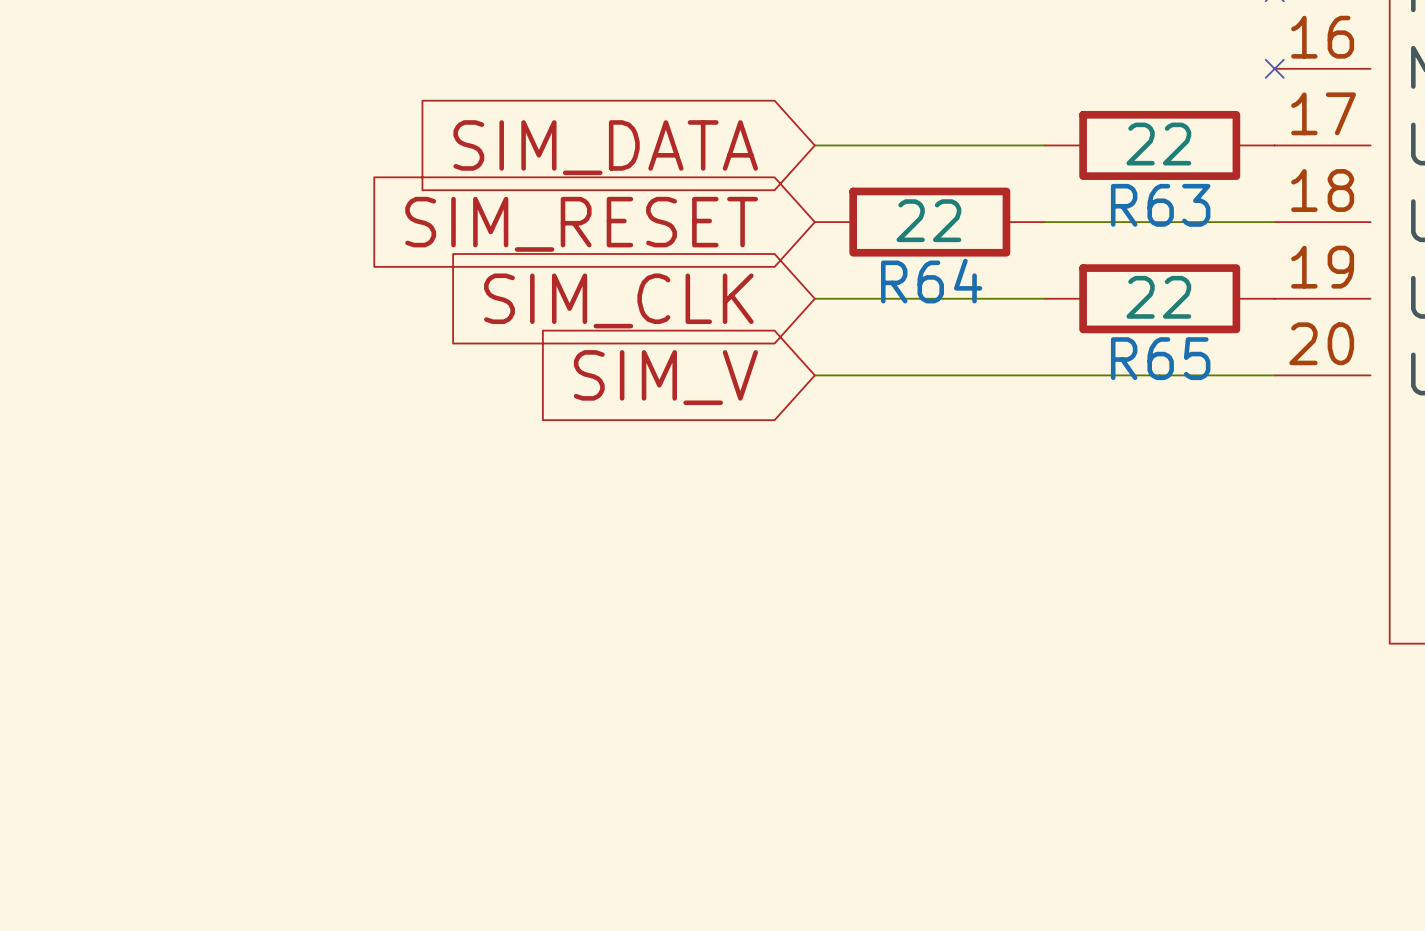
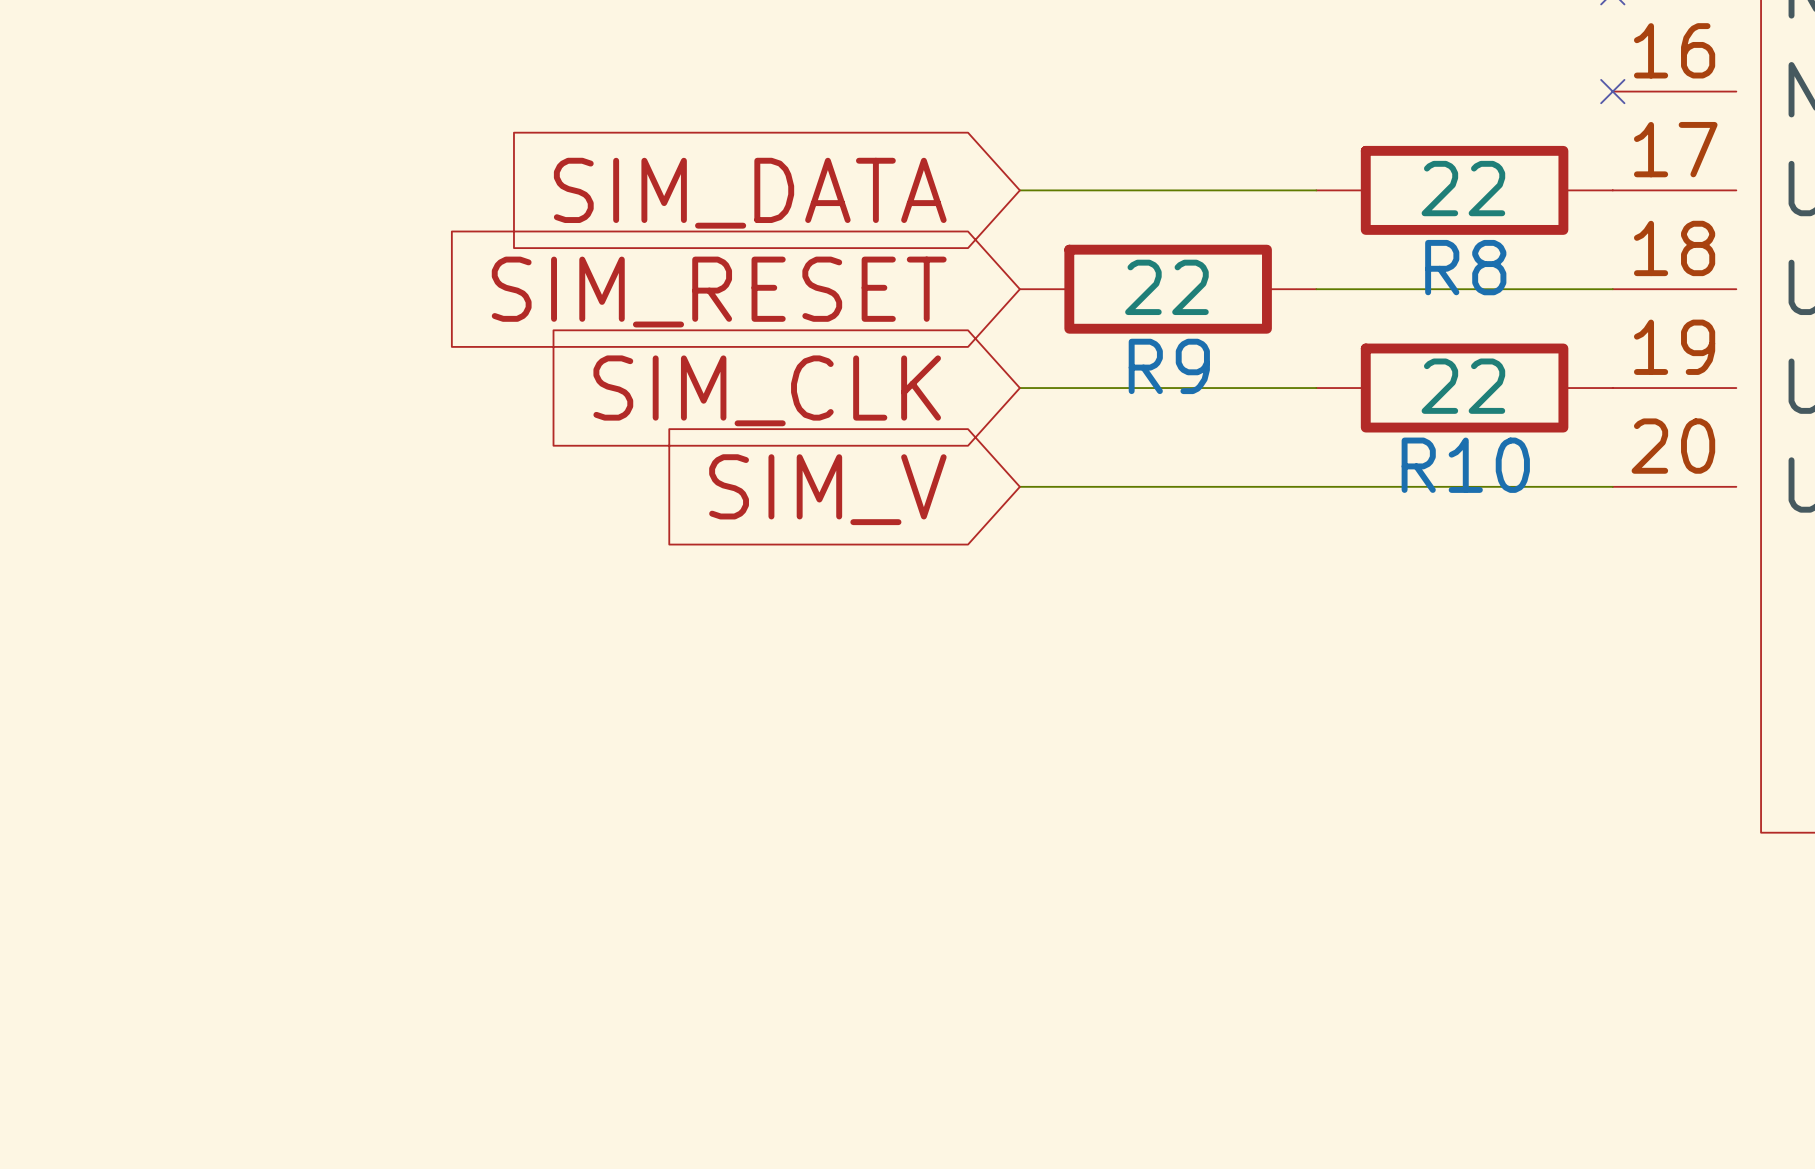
R63 name: R63 (1160, 205) -> R8 (1465, 267)
R64 name: R64 (931, 281) -> R9 (1169, 366)
R65 name: R65 (1160, 358) -> R10 (1465, 465)

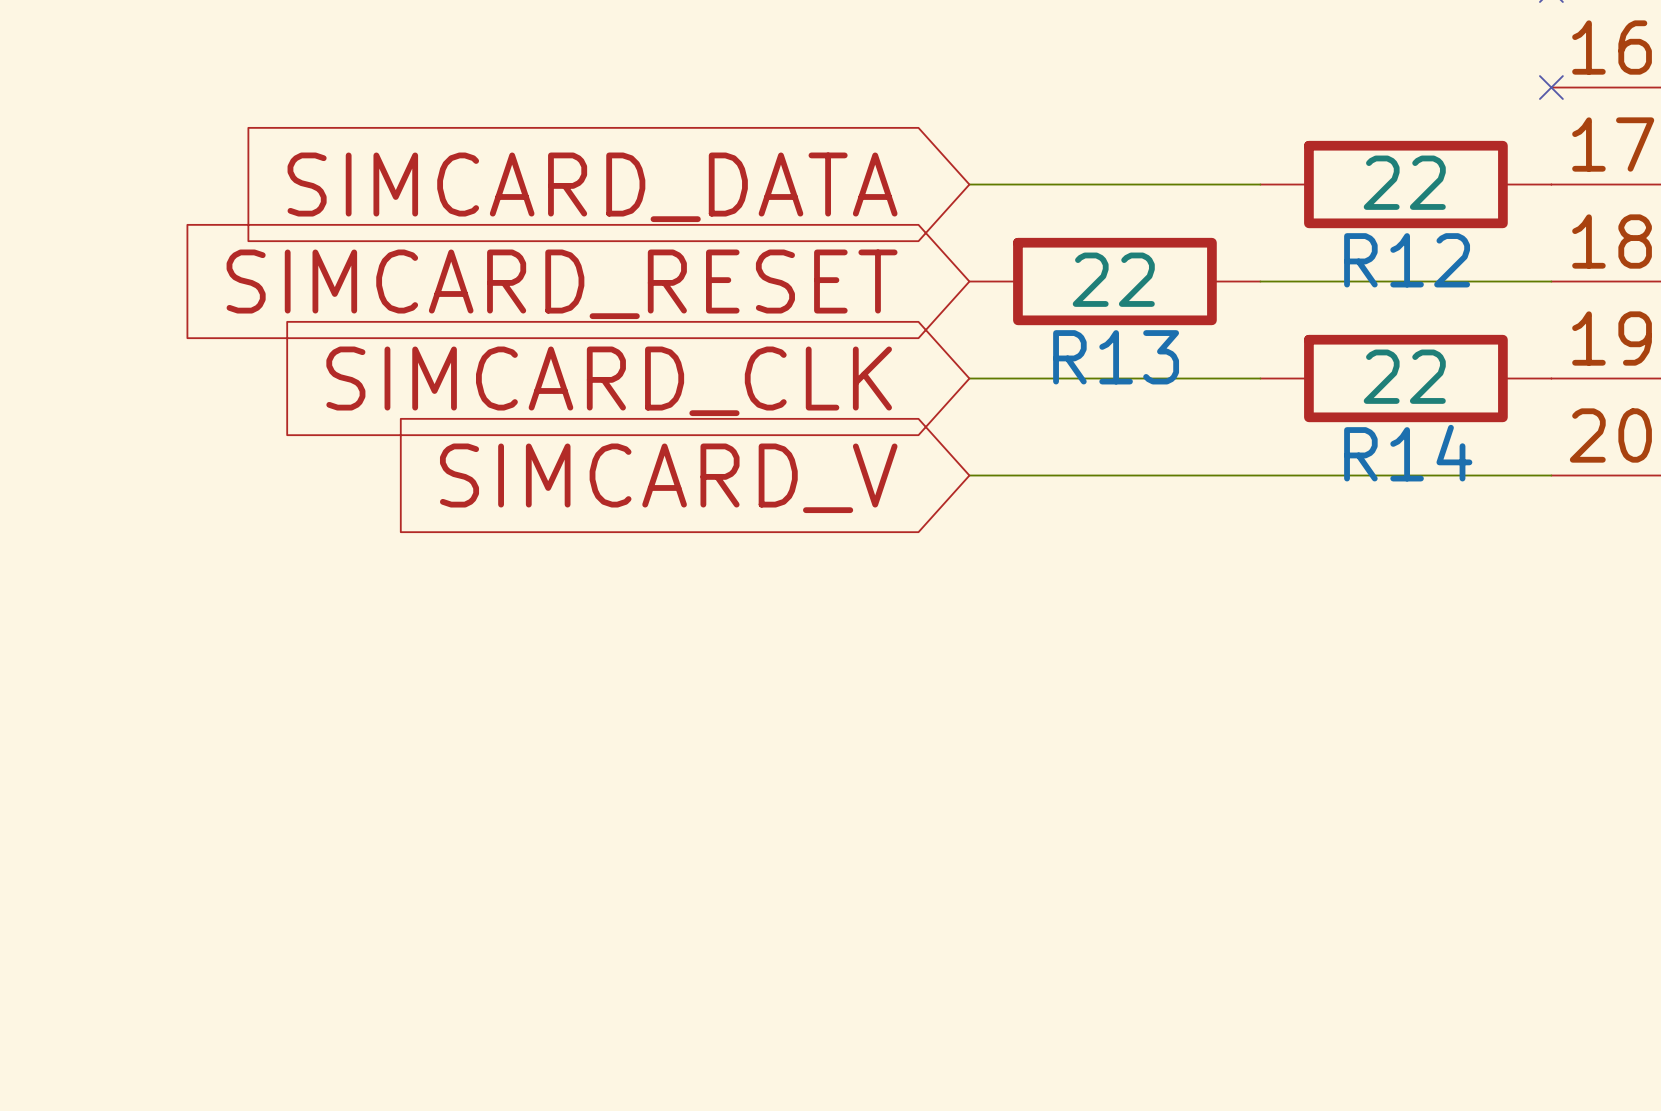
global label: SIM_DATA (750, 193) -> SIMCARD_DATA (592, 187)
R8 name: R8 (1465, 267) -> R12 (1407, 260)
global label: SIM_RESET (719, 292) -> SIMCARD_RESET (562, 284)
R9 name: R9 (1169, 366) -> R13 (1116, 357)
global label: SIM_CLK (767, 390) -> SIMCARD_CLK (609, 381)
R10 name: R10 (1465, 465) -> R14 (1408, 453)
global label: SIM_V (827, 489) -> SIMCARD_V (668, 478)

